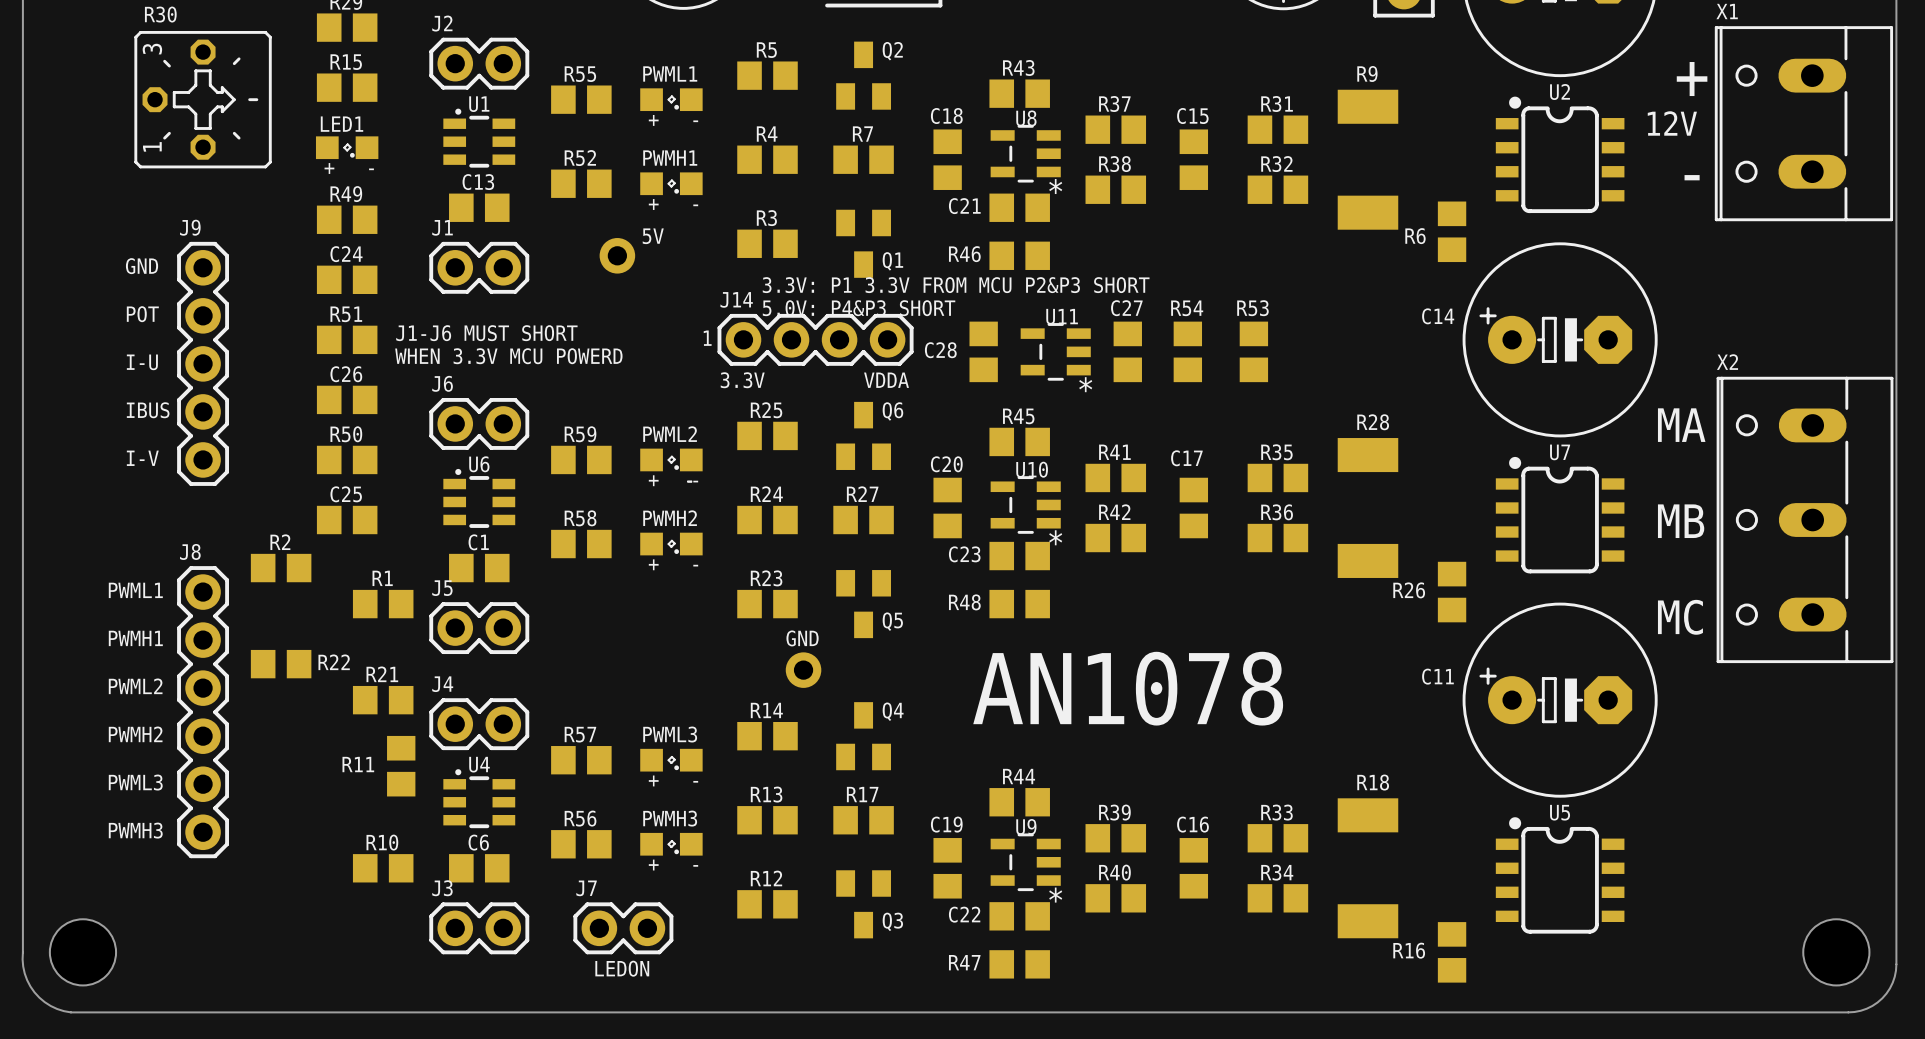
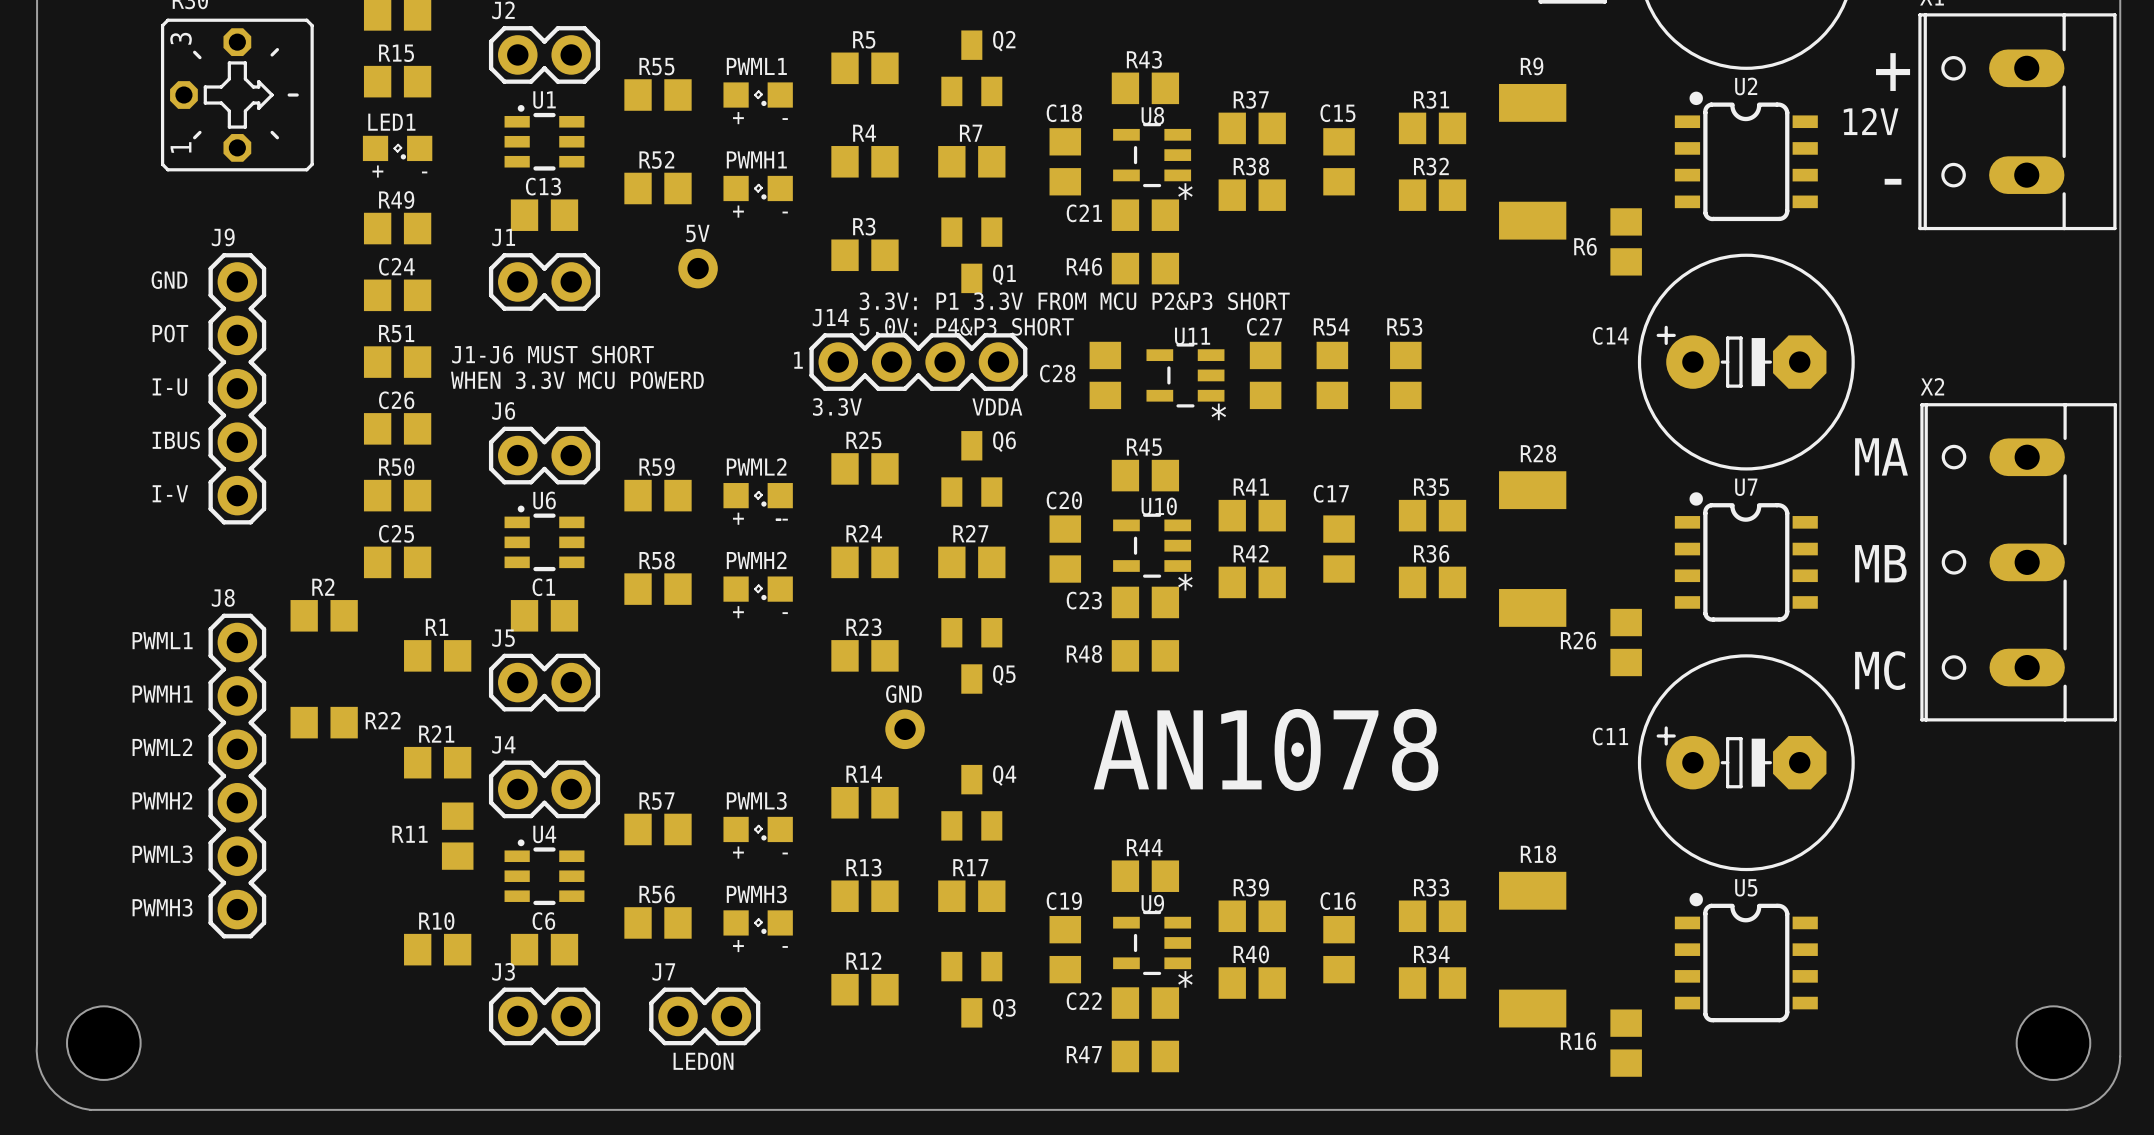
text position: 5V (653, 236) -> 5V (697, 233)

